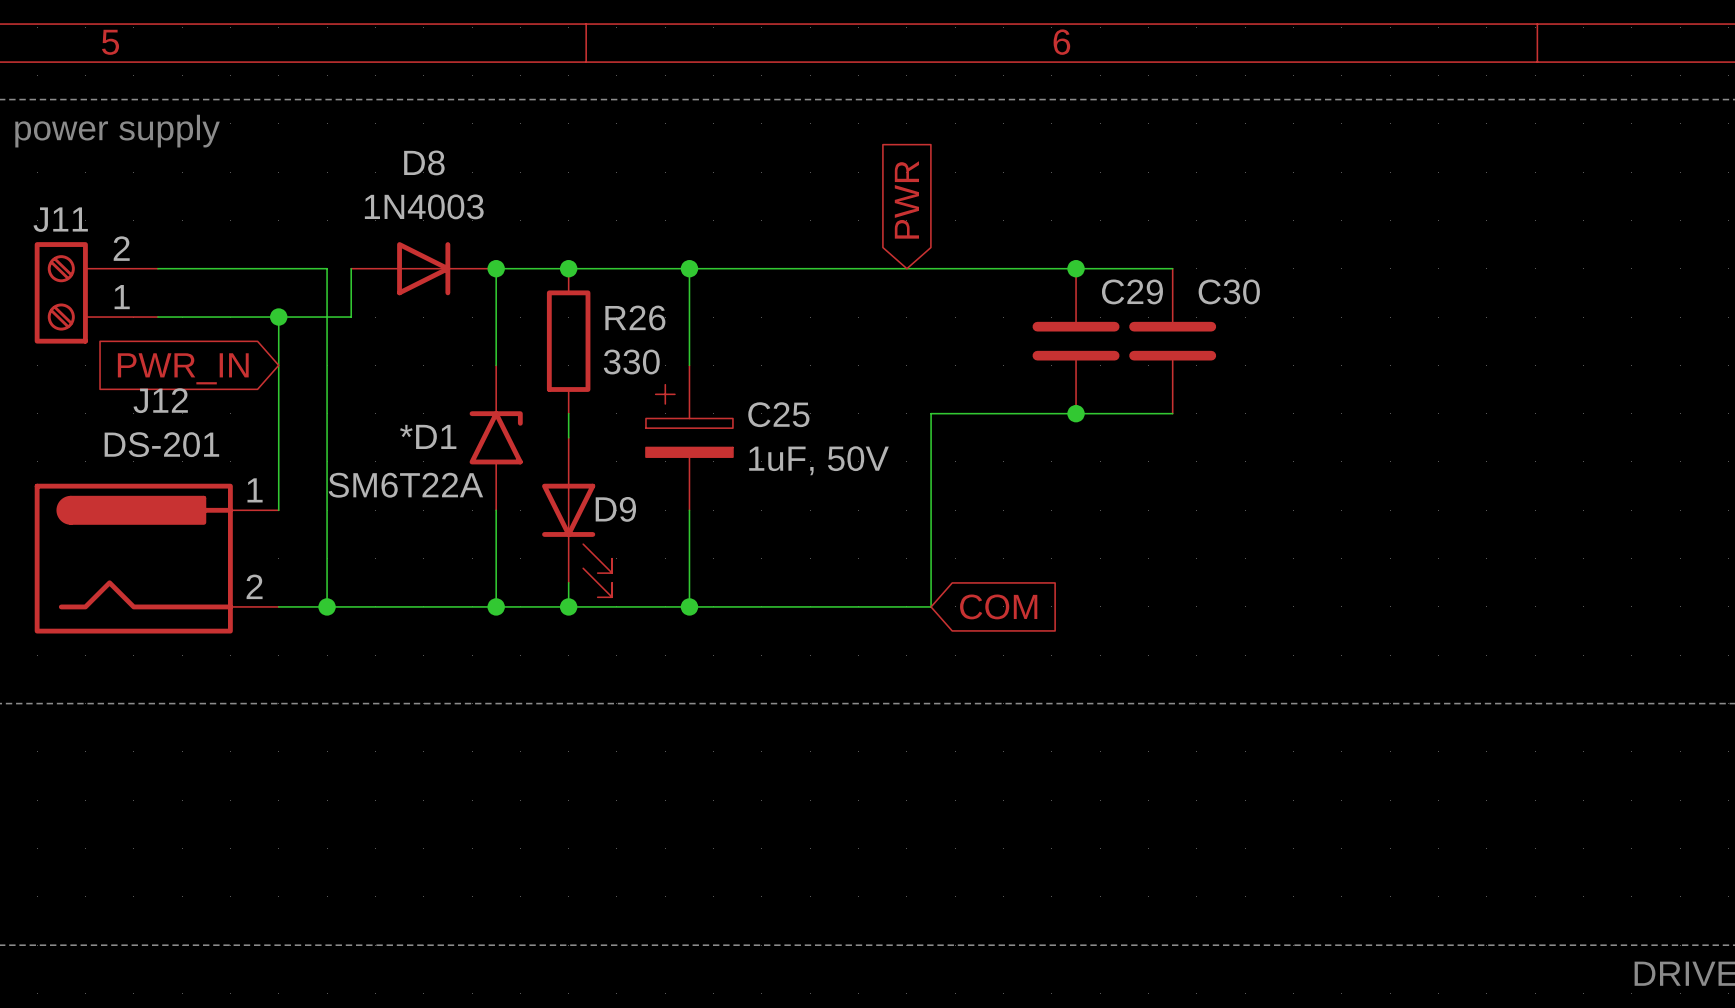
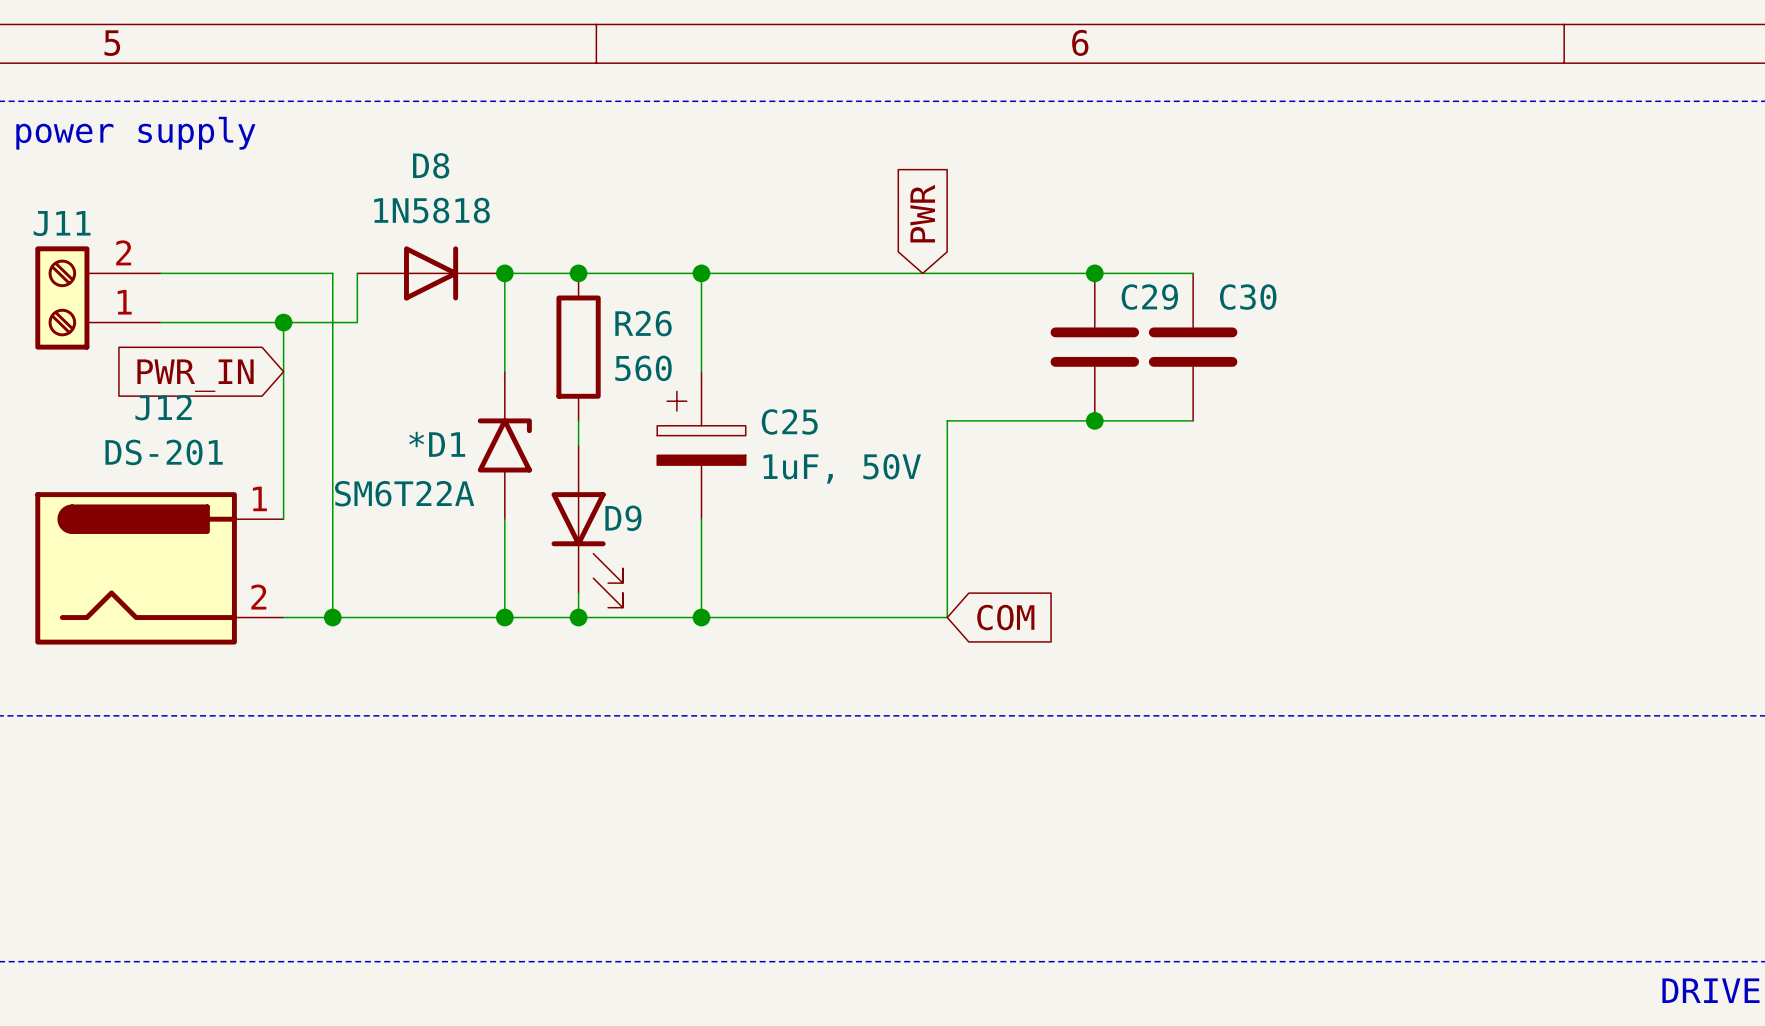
D8 value: 1N4003 (424, 206) -> 1N5818 (432, 210)
R26 value: 330 (631, 362) -> 560 (643, 368)

